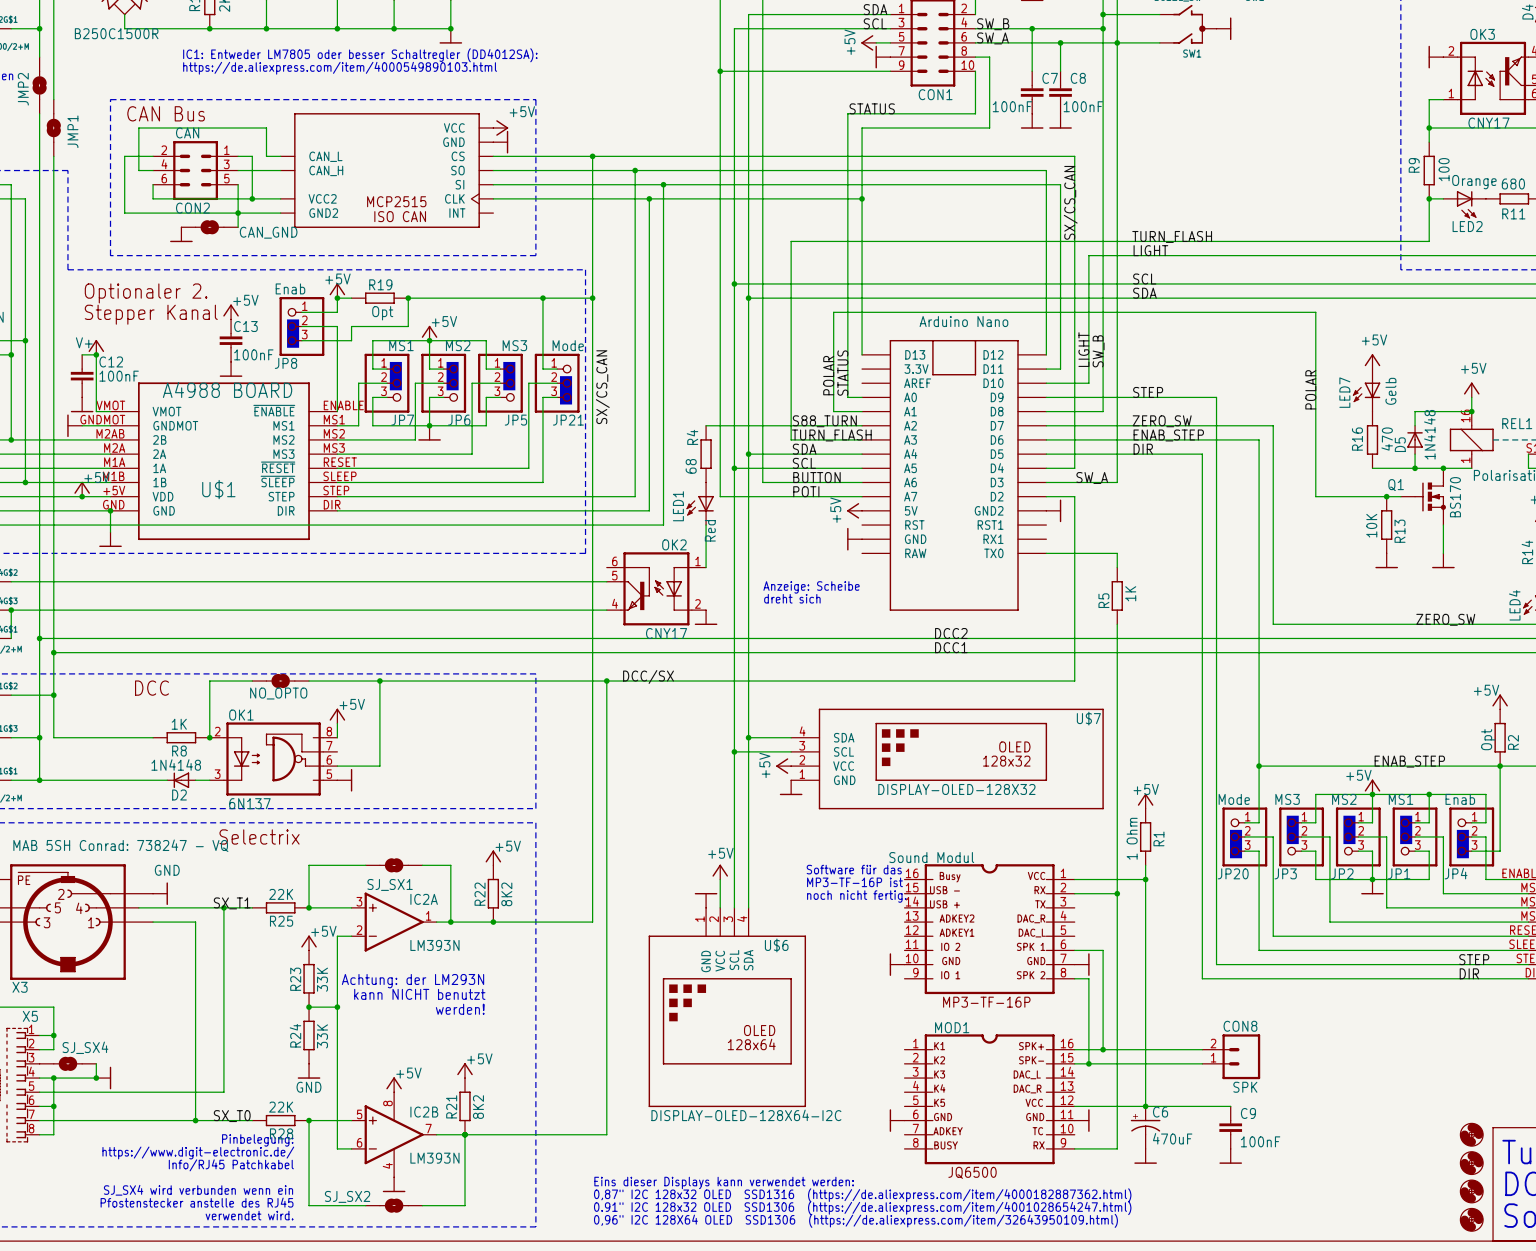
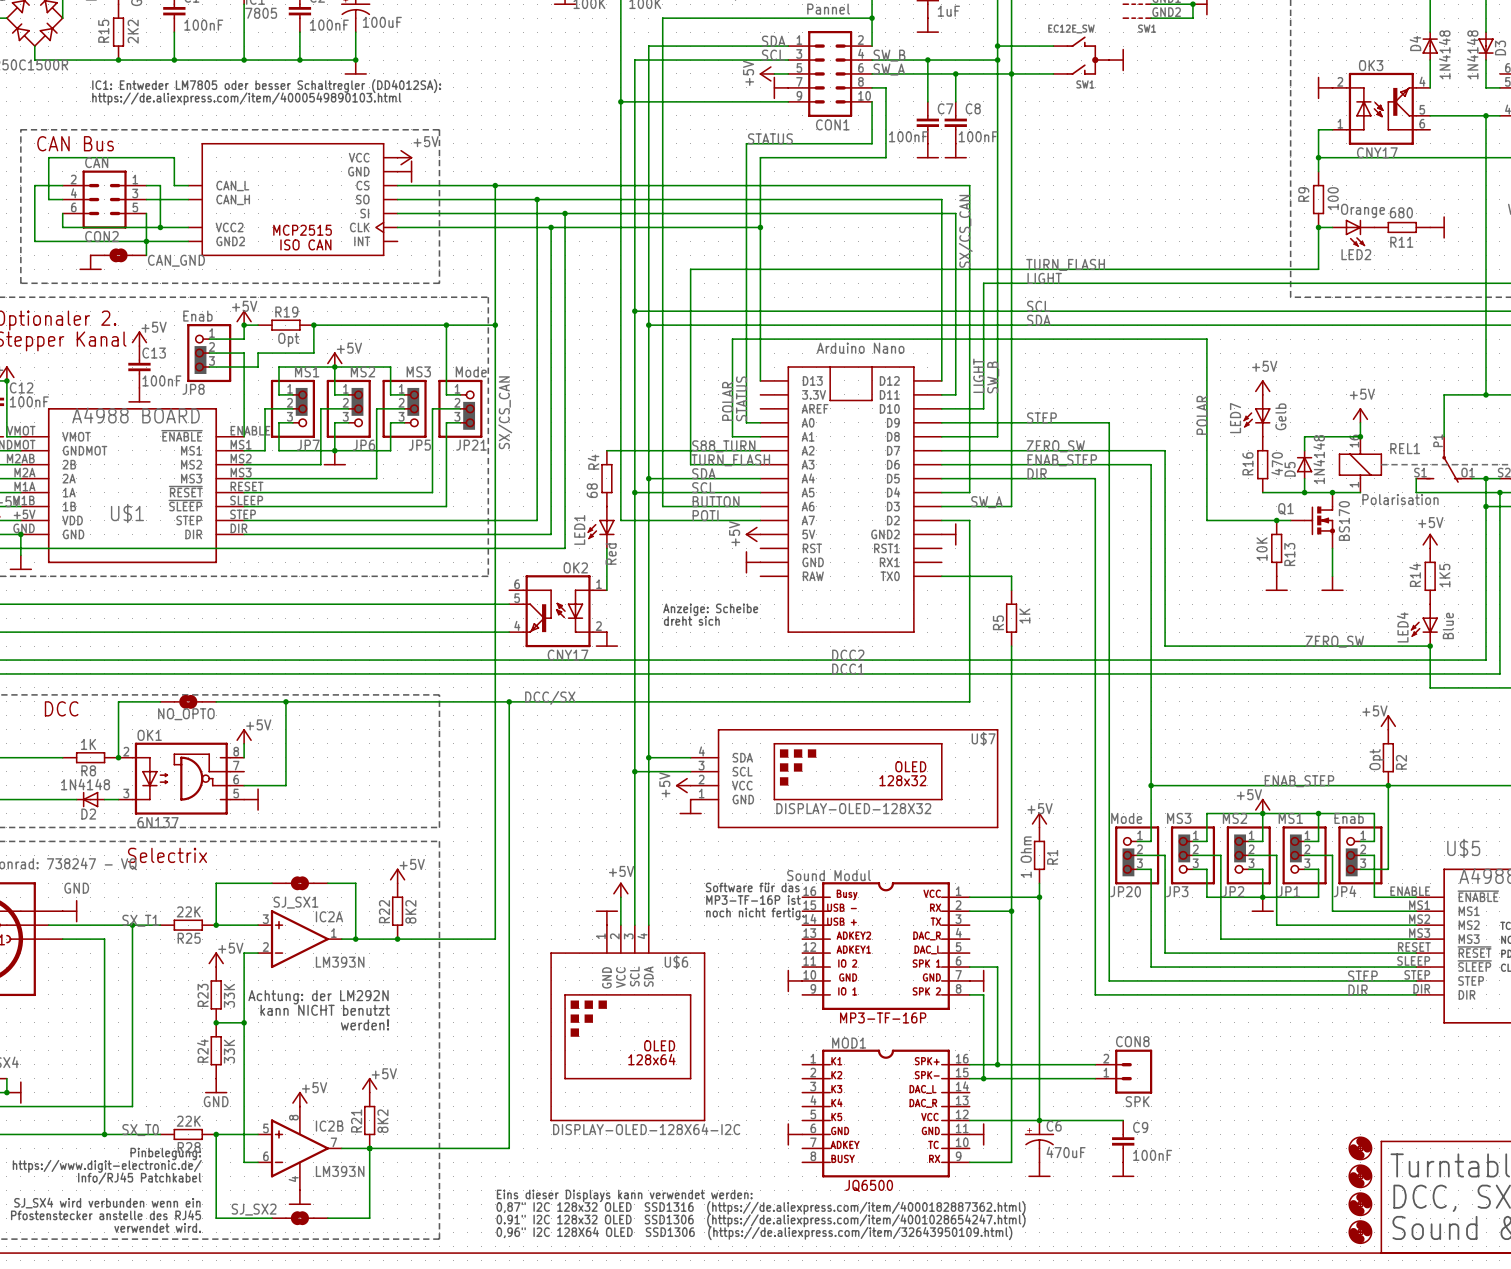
text: Achtung: der LM293N (413, 981) -> Achtung: der LM292N (318, 997)

